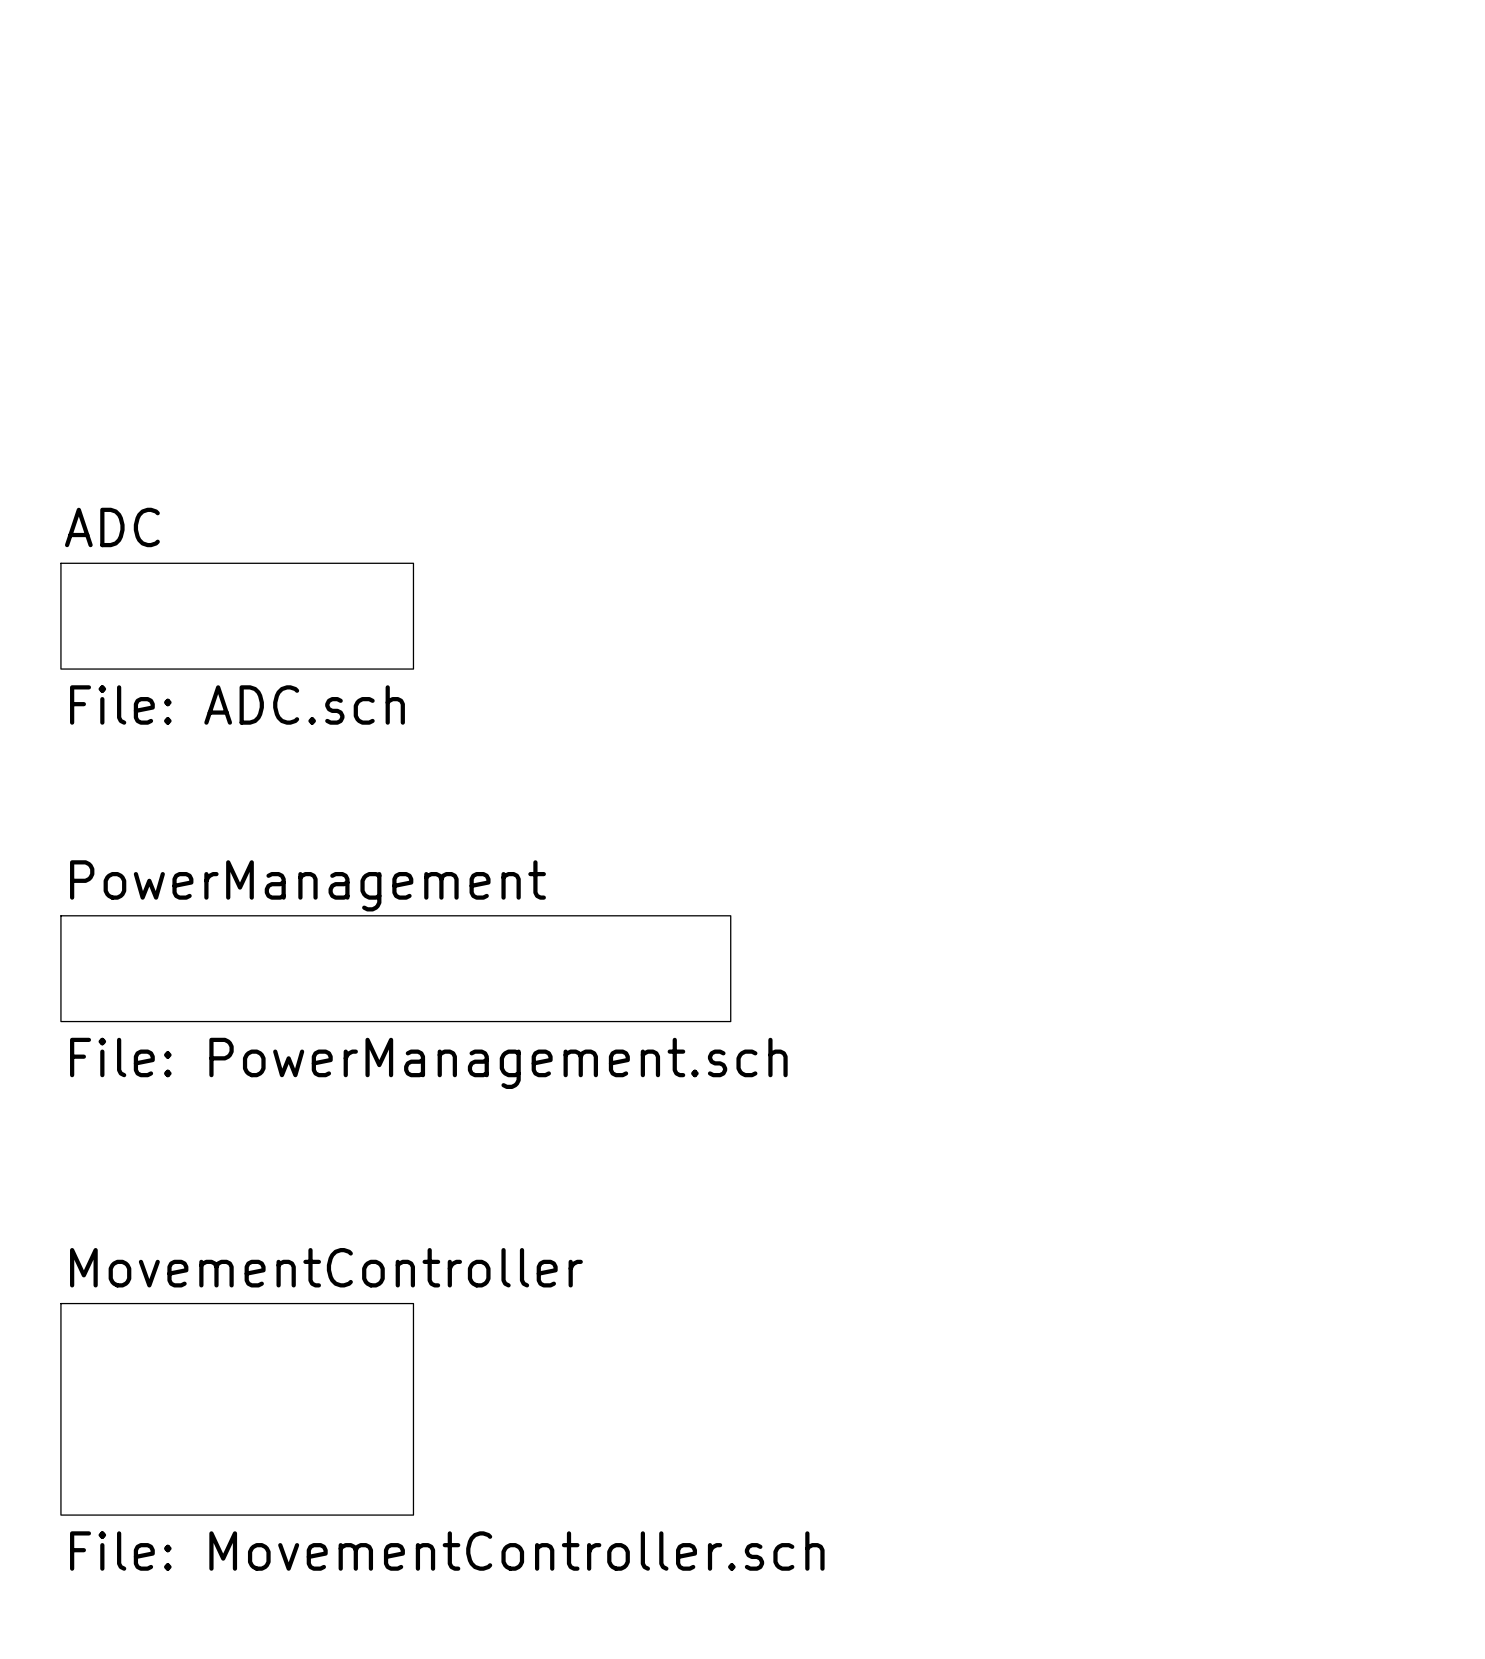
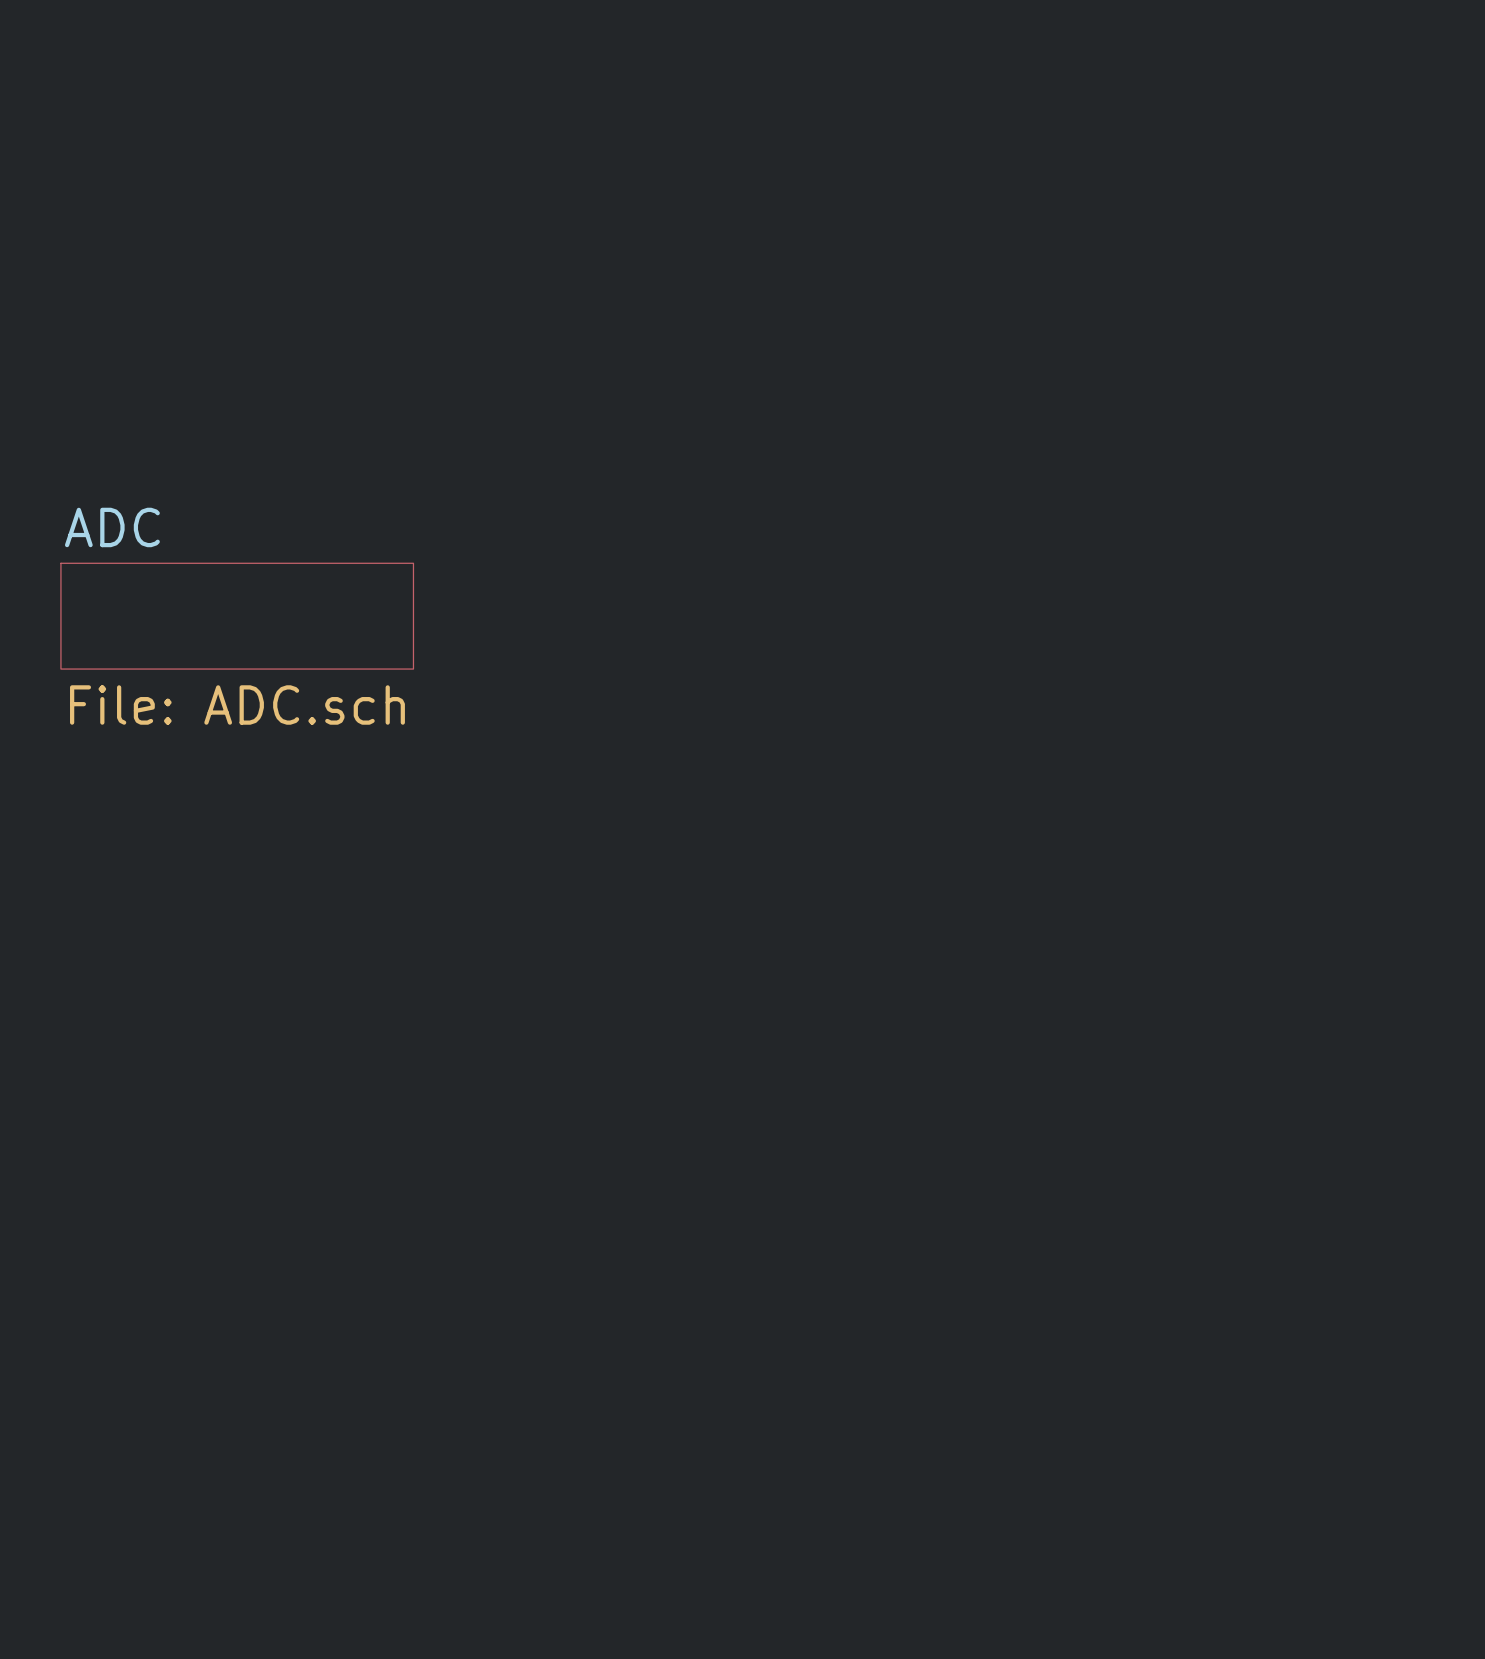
sheet PowerManagement: File: PowerManagement.sch (395, 968) -> none
sheet MovementController: File: MovementController.sch (237, 1409) -> none

